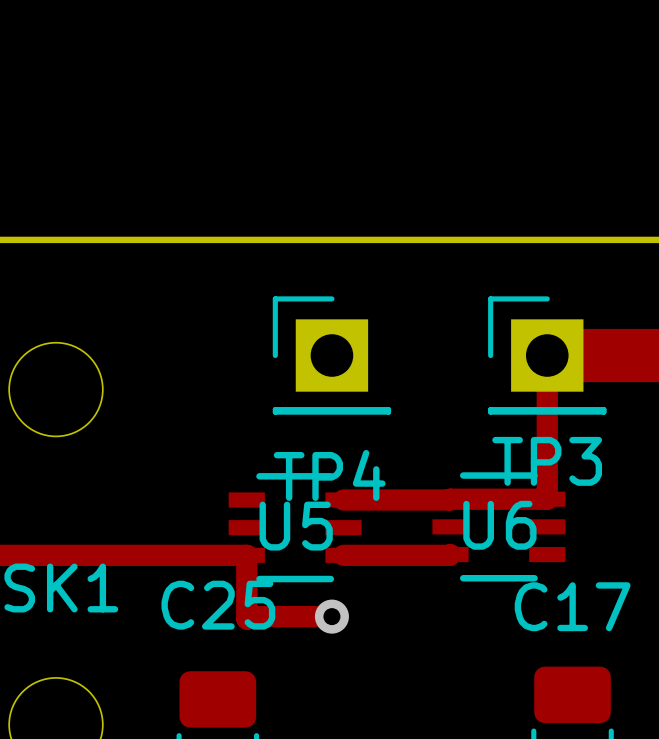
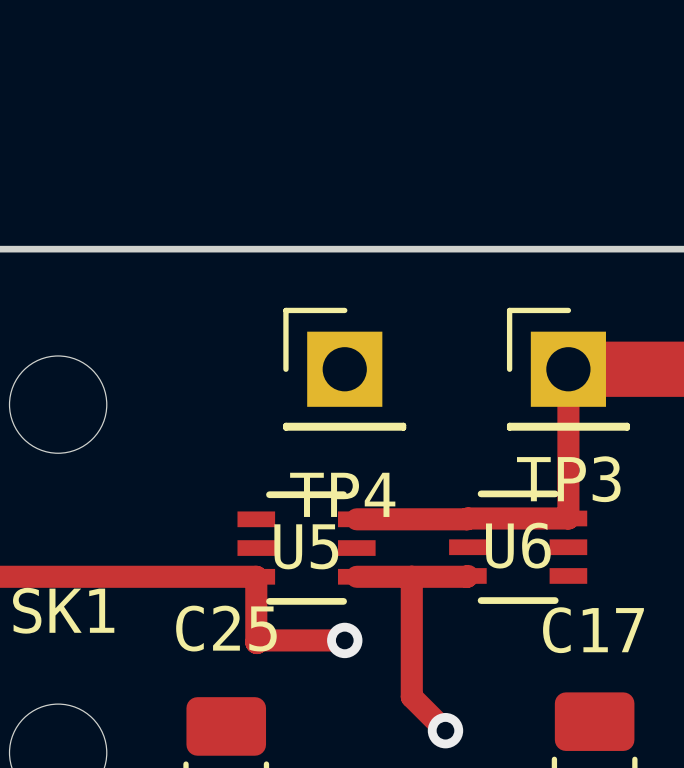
track: none -> (411, 576) (411, 696) (445, 730)
via: none -> (445, 730)

